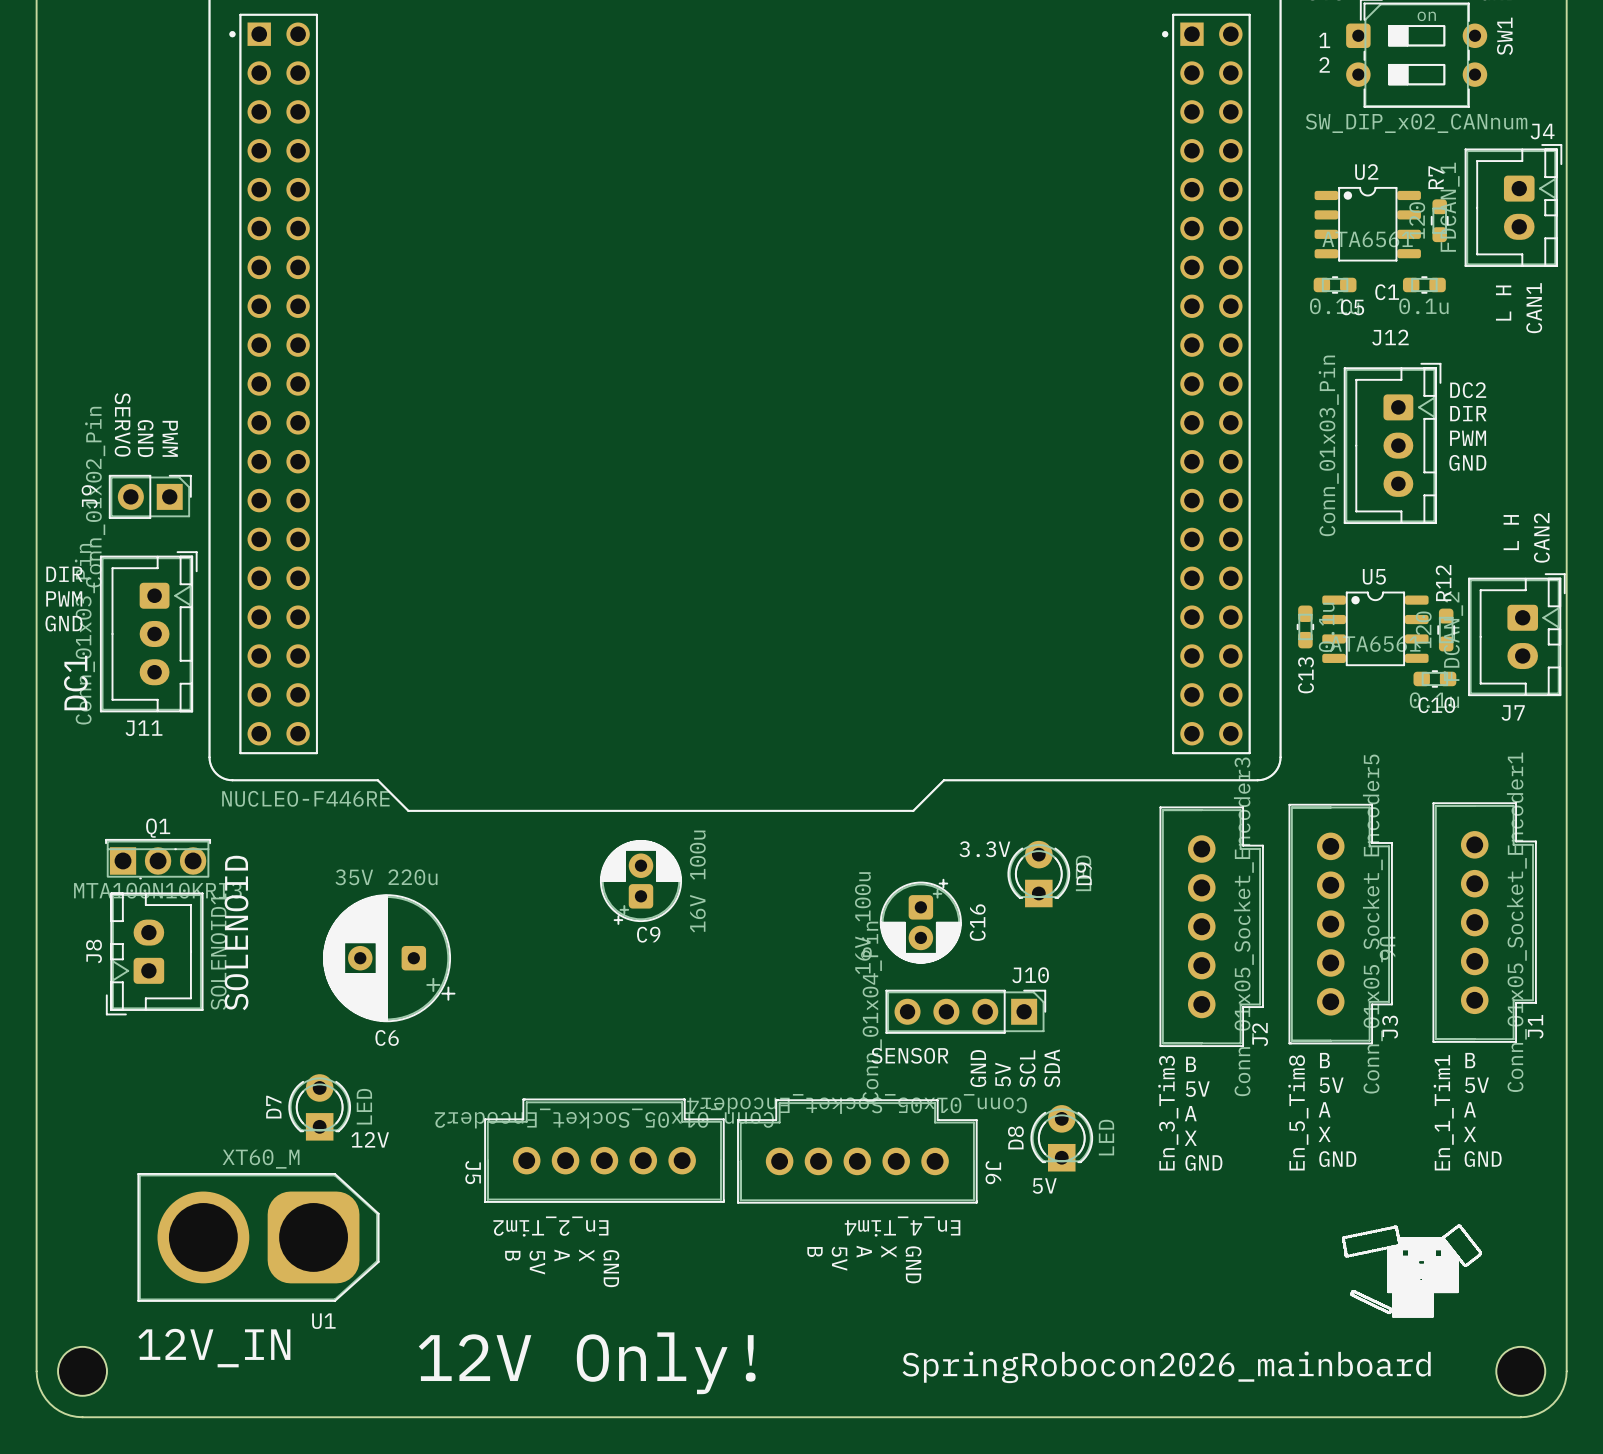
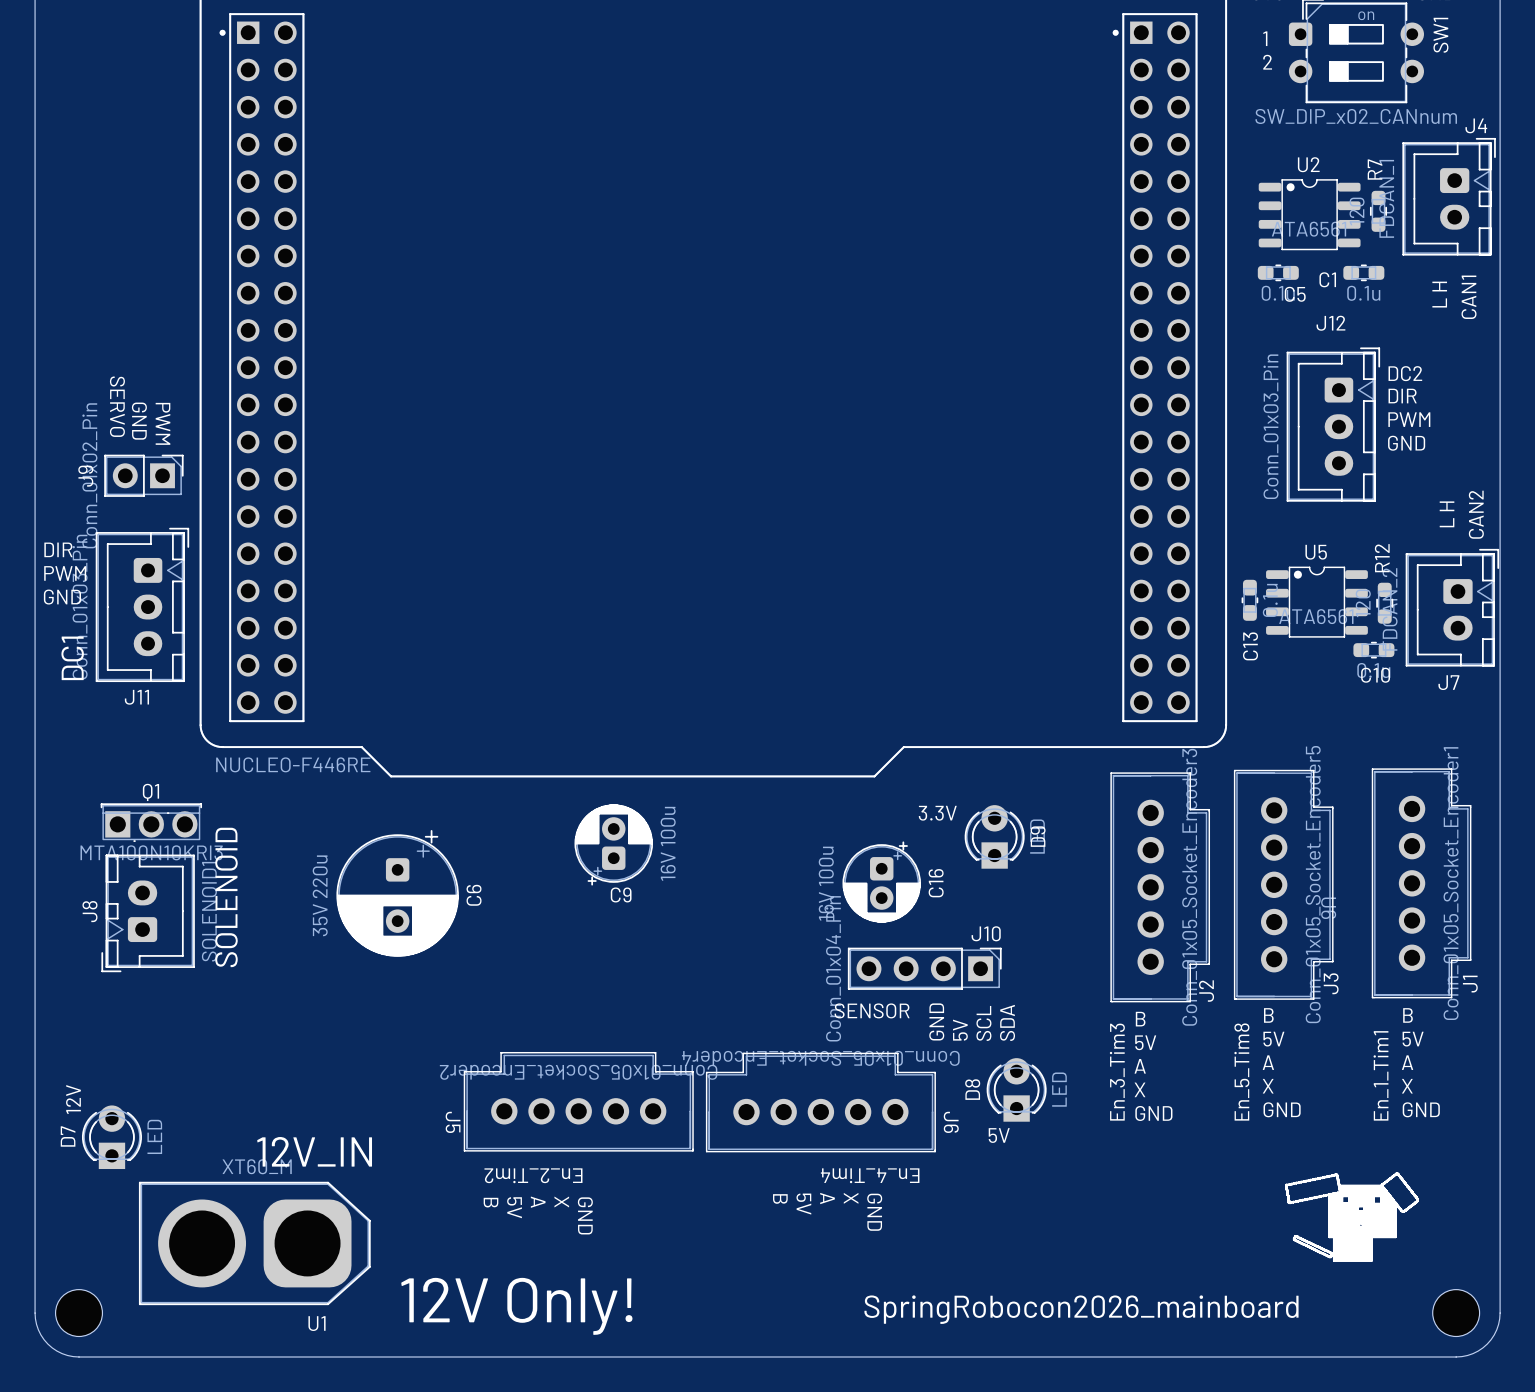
C6 rotation: 0° (389, 958) -> 90° counterclockwise (397, 893)
D7 position: (319, 1107) -> (111, 1137)
text rotation: 0° (370, 1139) -> 90° counterclockwise (73, 1099)
text position: 12V (370, 1139) -> 12V (73, 1099)
U1 position: (258, 1237) -> (254, 1243)
text position: 12V_IN (214, 1348) -> 12V_IN (314, 1151)

